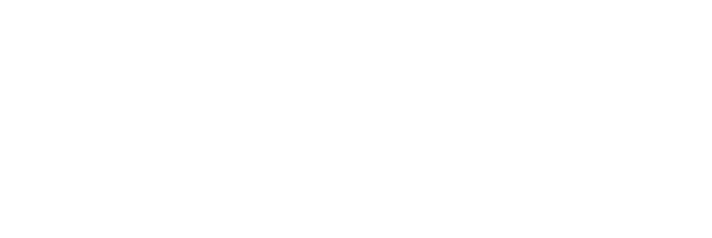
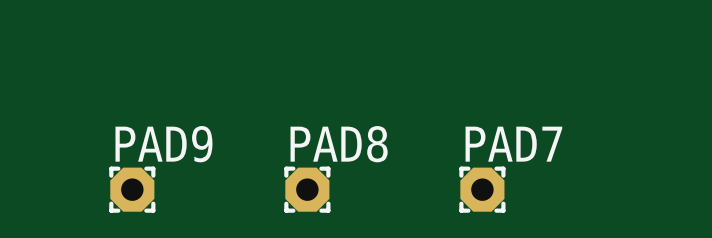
PAD9: none -> (132, 189)
PAD8: none -> (307, 189)
PAD7: none -> (482, 189)

